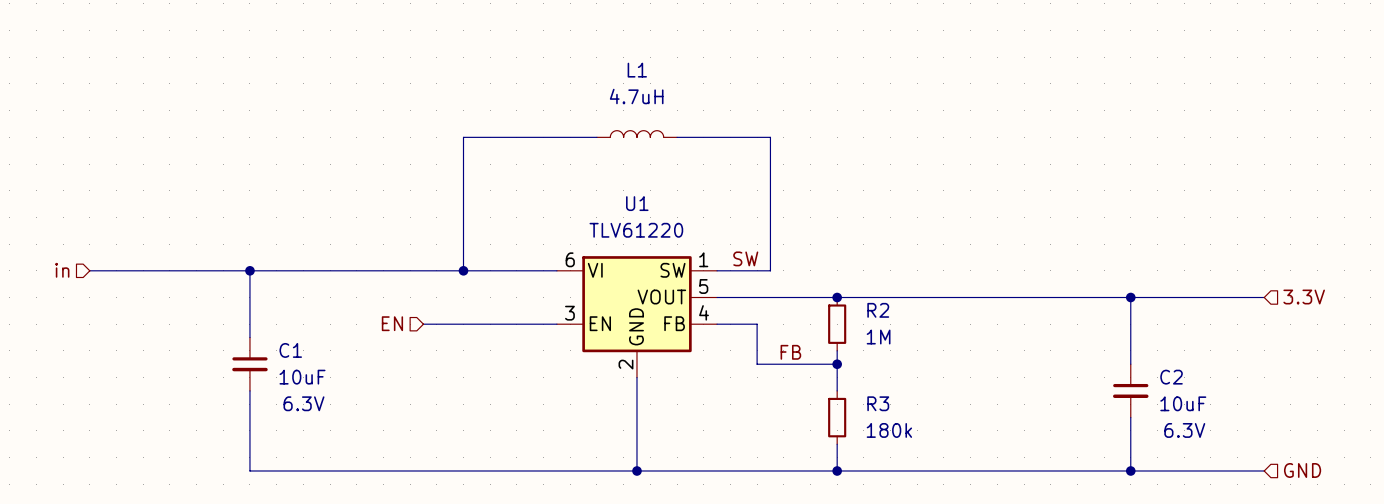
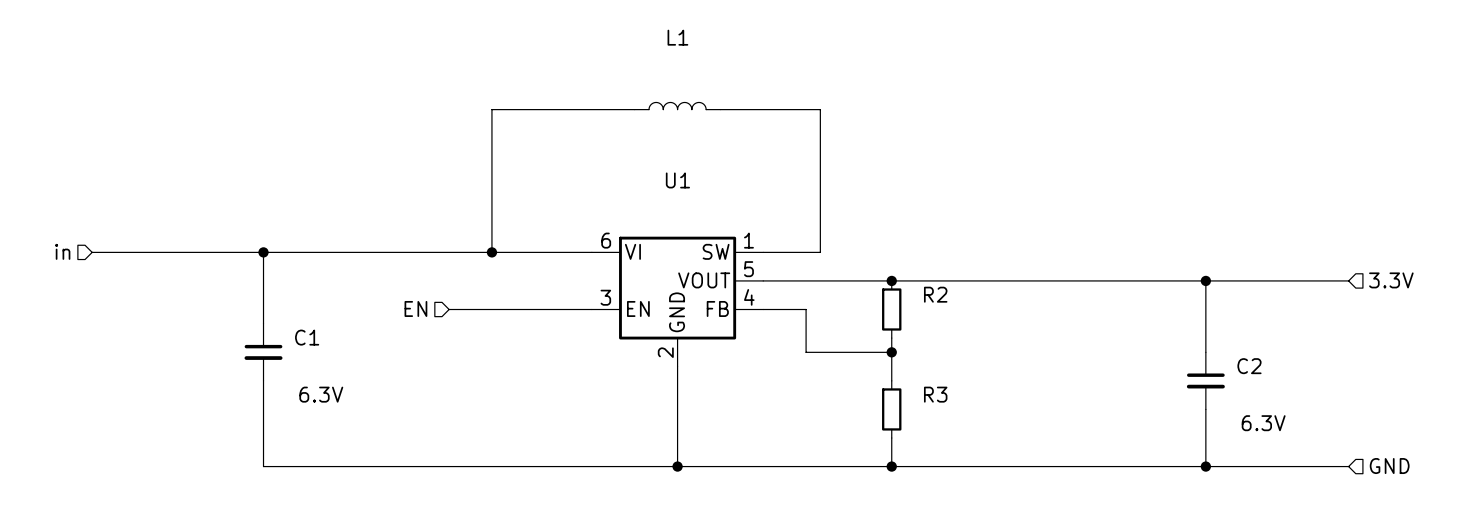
L1 value: 4.7uH (636, 96) -> none
U1 value: TLV61220 (636, 230) -> none
label: SW (745, 258) -> none
R2 value: 1M (878, 337) -> none
label: FB (790, 352) -> none
C1 value: 10uF (302, 377) -> none
C2 value: 10uF (1183, 403) -> none
R3 value: 180k (889, 430) -> none

